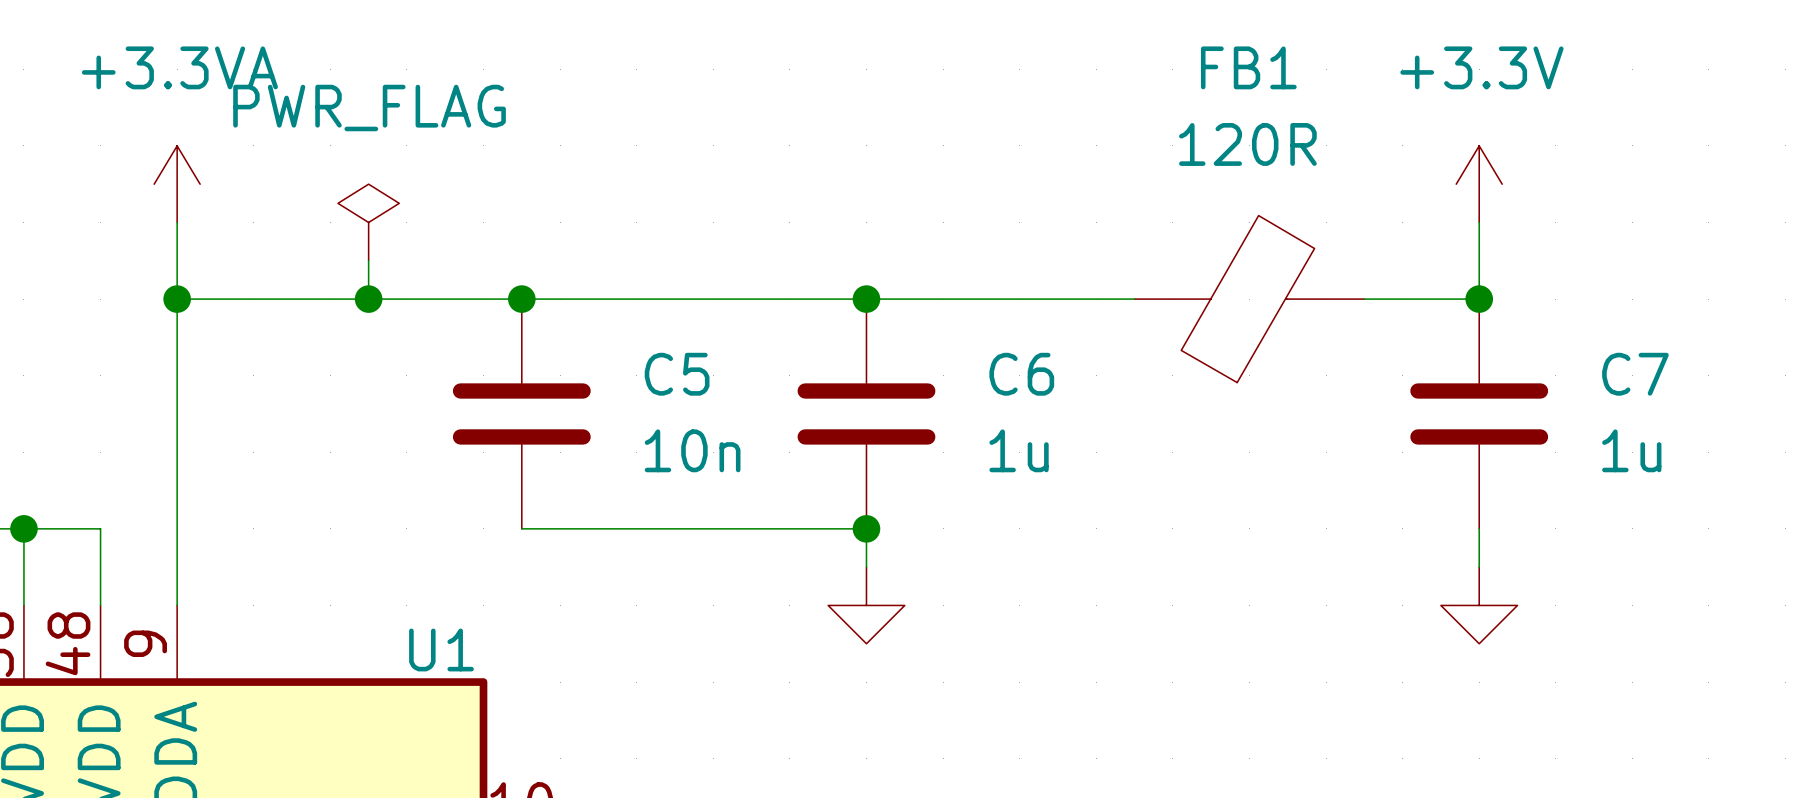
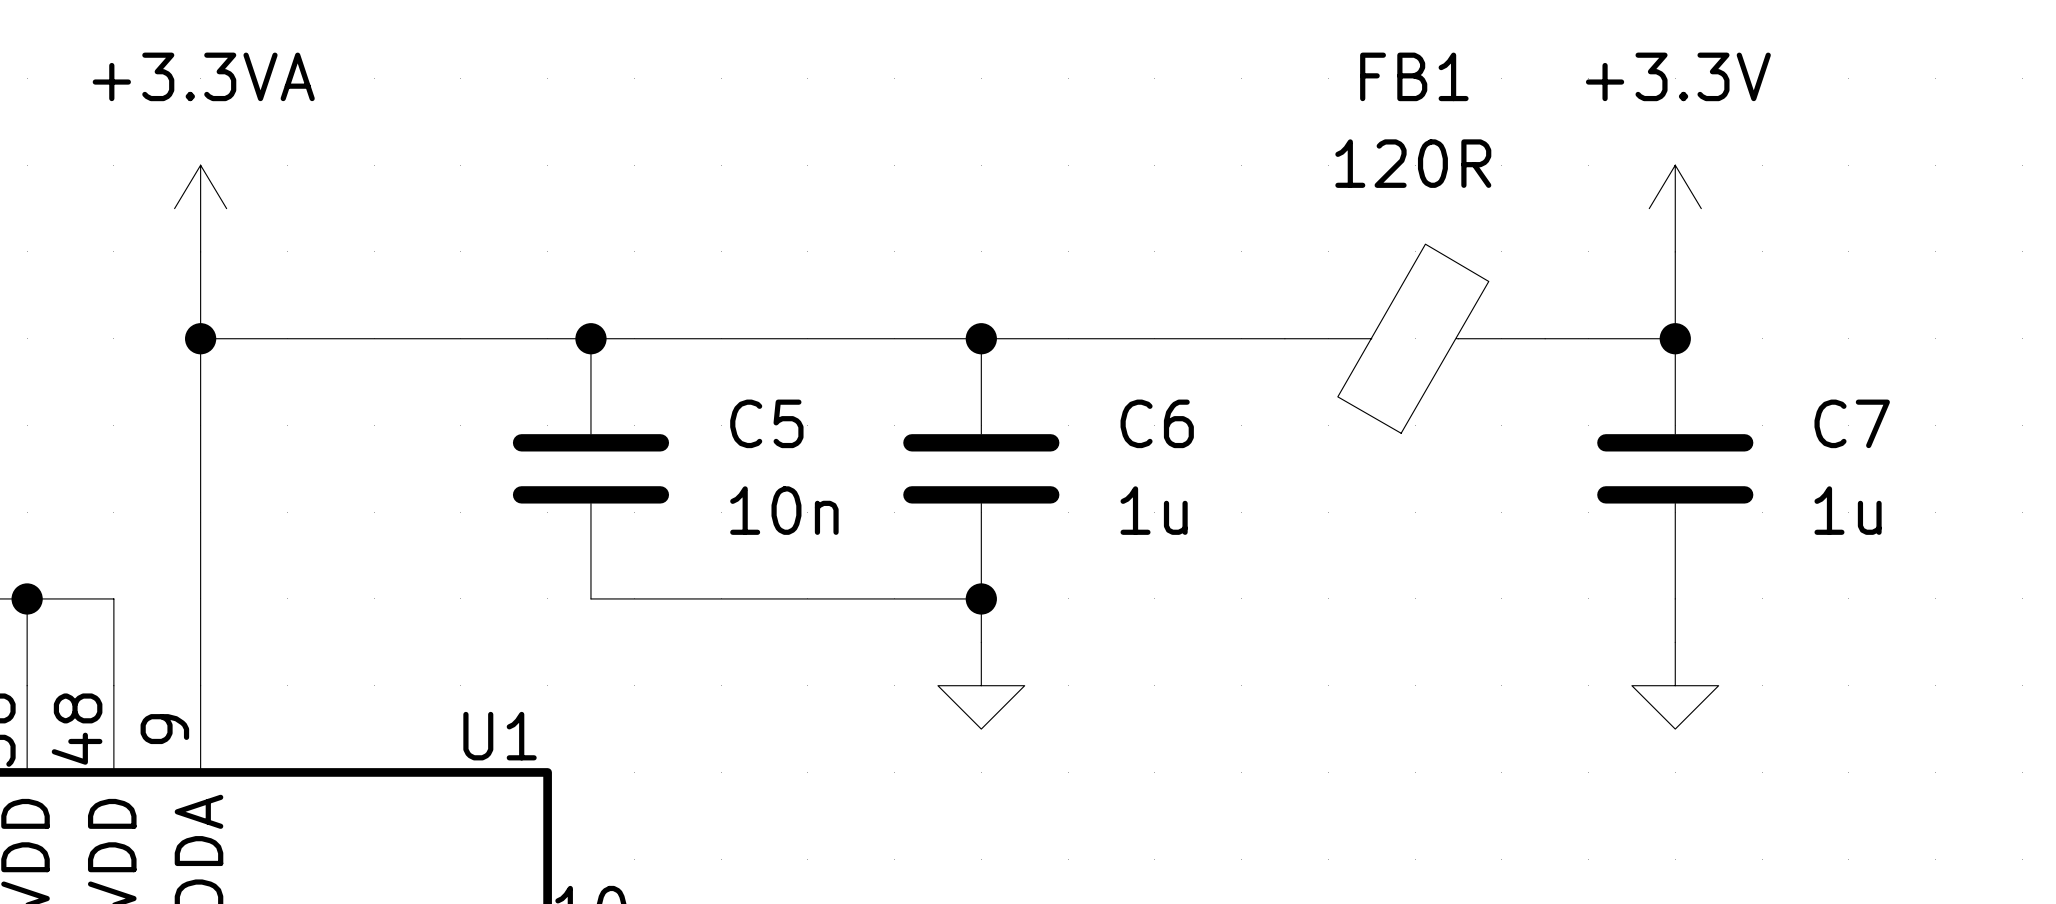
power symbol: PWR_FLAG (368, 222) -> none
wire: (368, 260) (368, 299) -> none
junction: (368, 299) -> none

